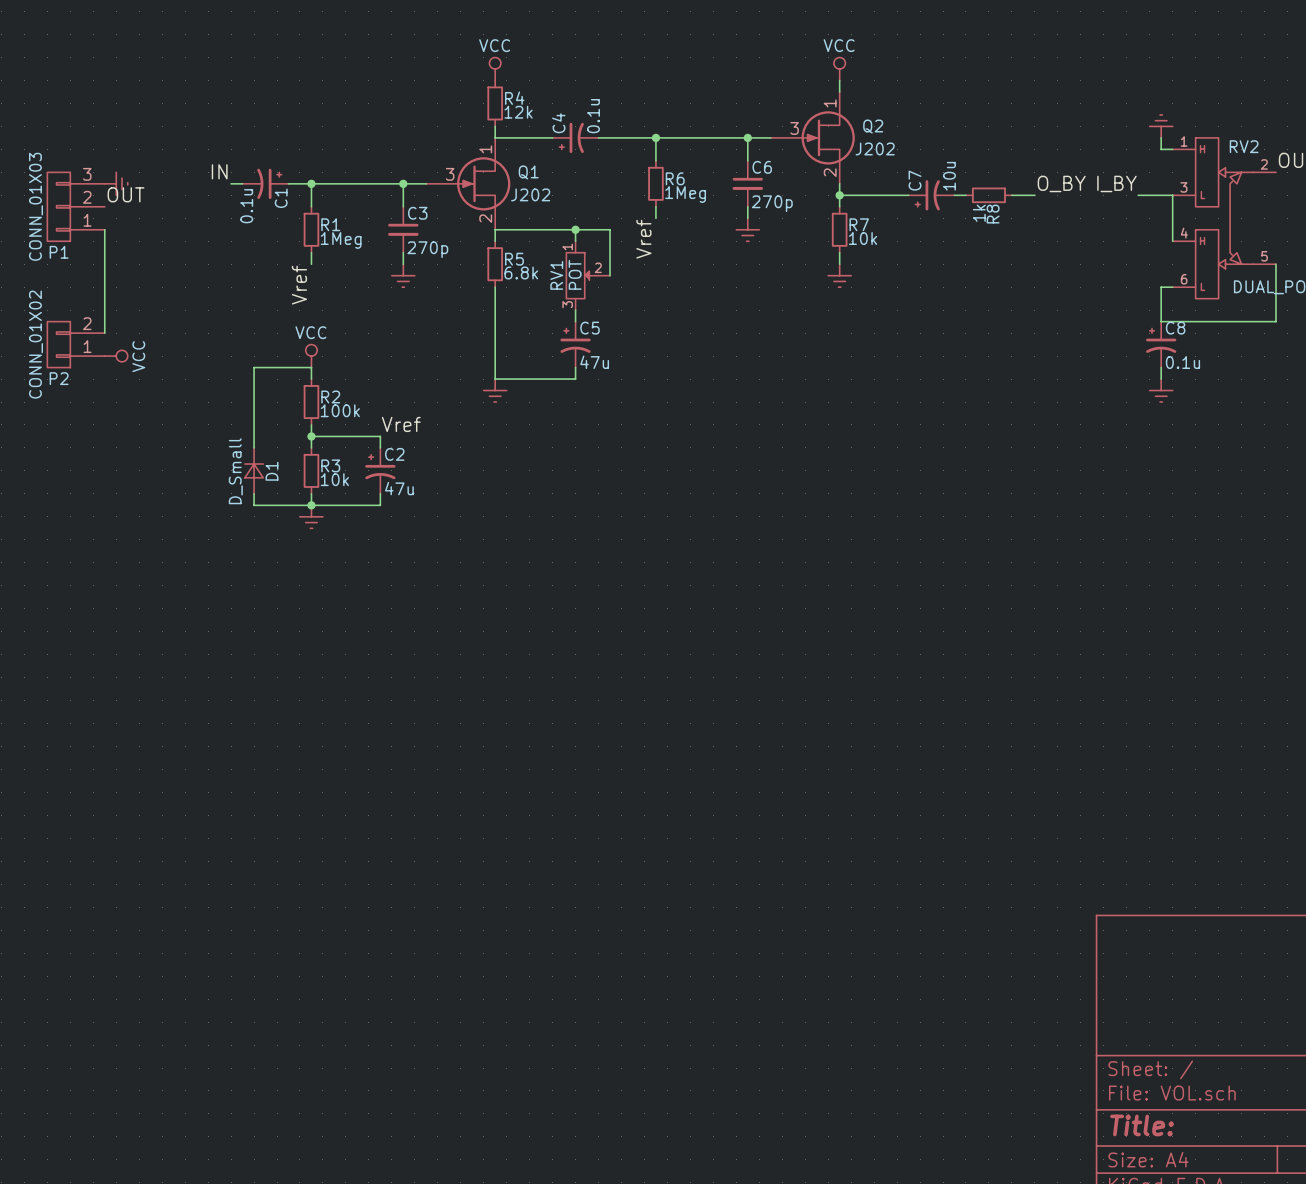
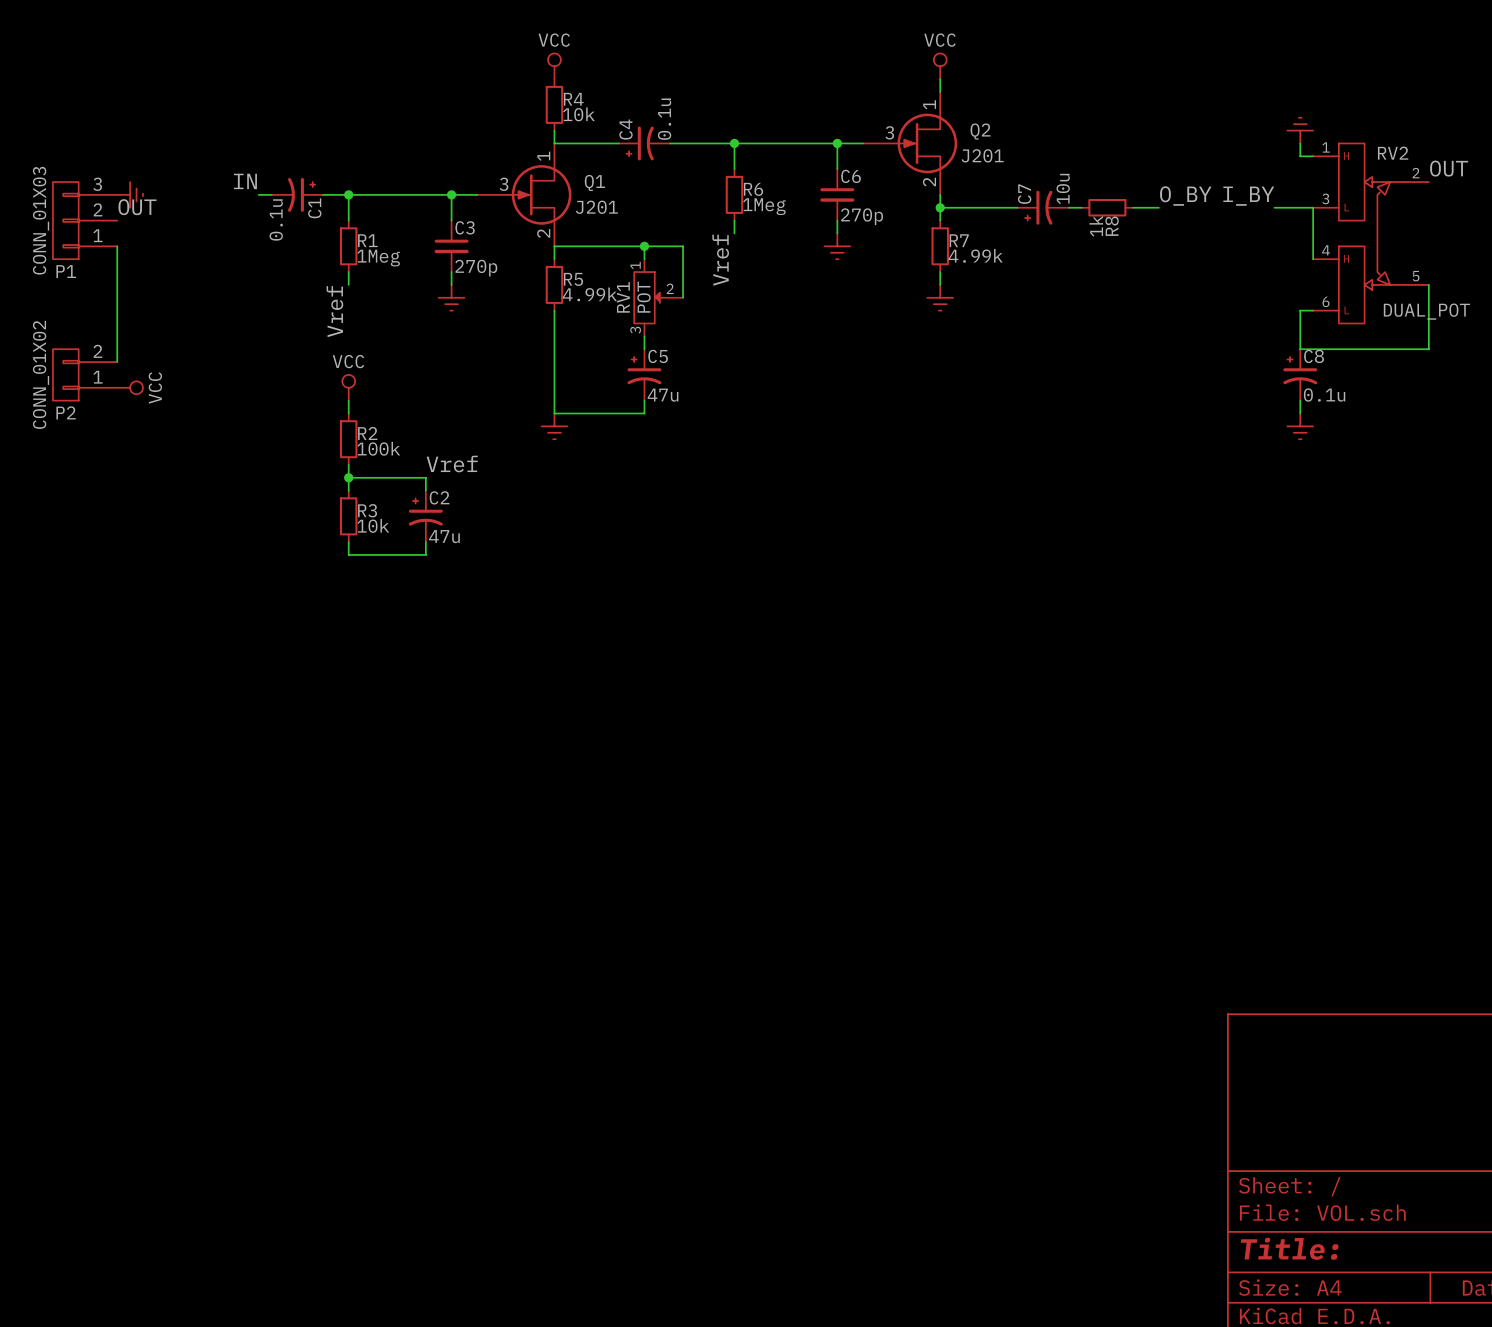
R4 value: 12k (518, 112) -> 10k (579, 114)
Q2 value: J202 (875, 148) -> J201 (982, 155)
Q1 value: J202 (530, 194) -> J201 (596, 207)
R7 value: 10k (863, 238) -> 4.99k (975, 255)
R5 value: 6.8k (521, 272) -> 4.99k (589, 294)
wire: (311, 367) (254, 367) (254, 447) -> none
D1: D_Small (254, 470) -> none
wire: (254, 493) (254, 505) (311, 505) -> none
junction: (311, 505) -> none
power symbol: (311, 516) -> none

